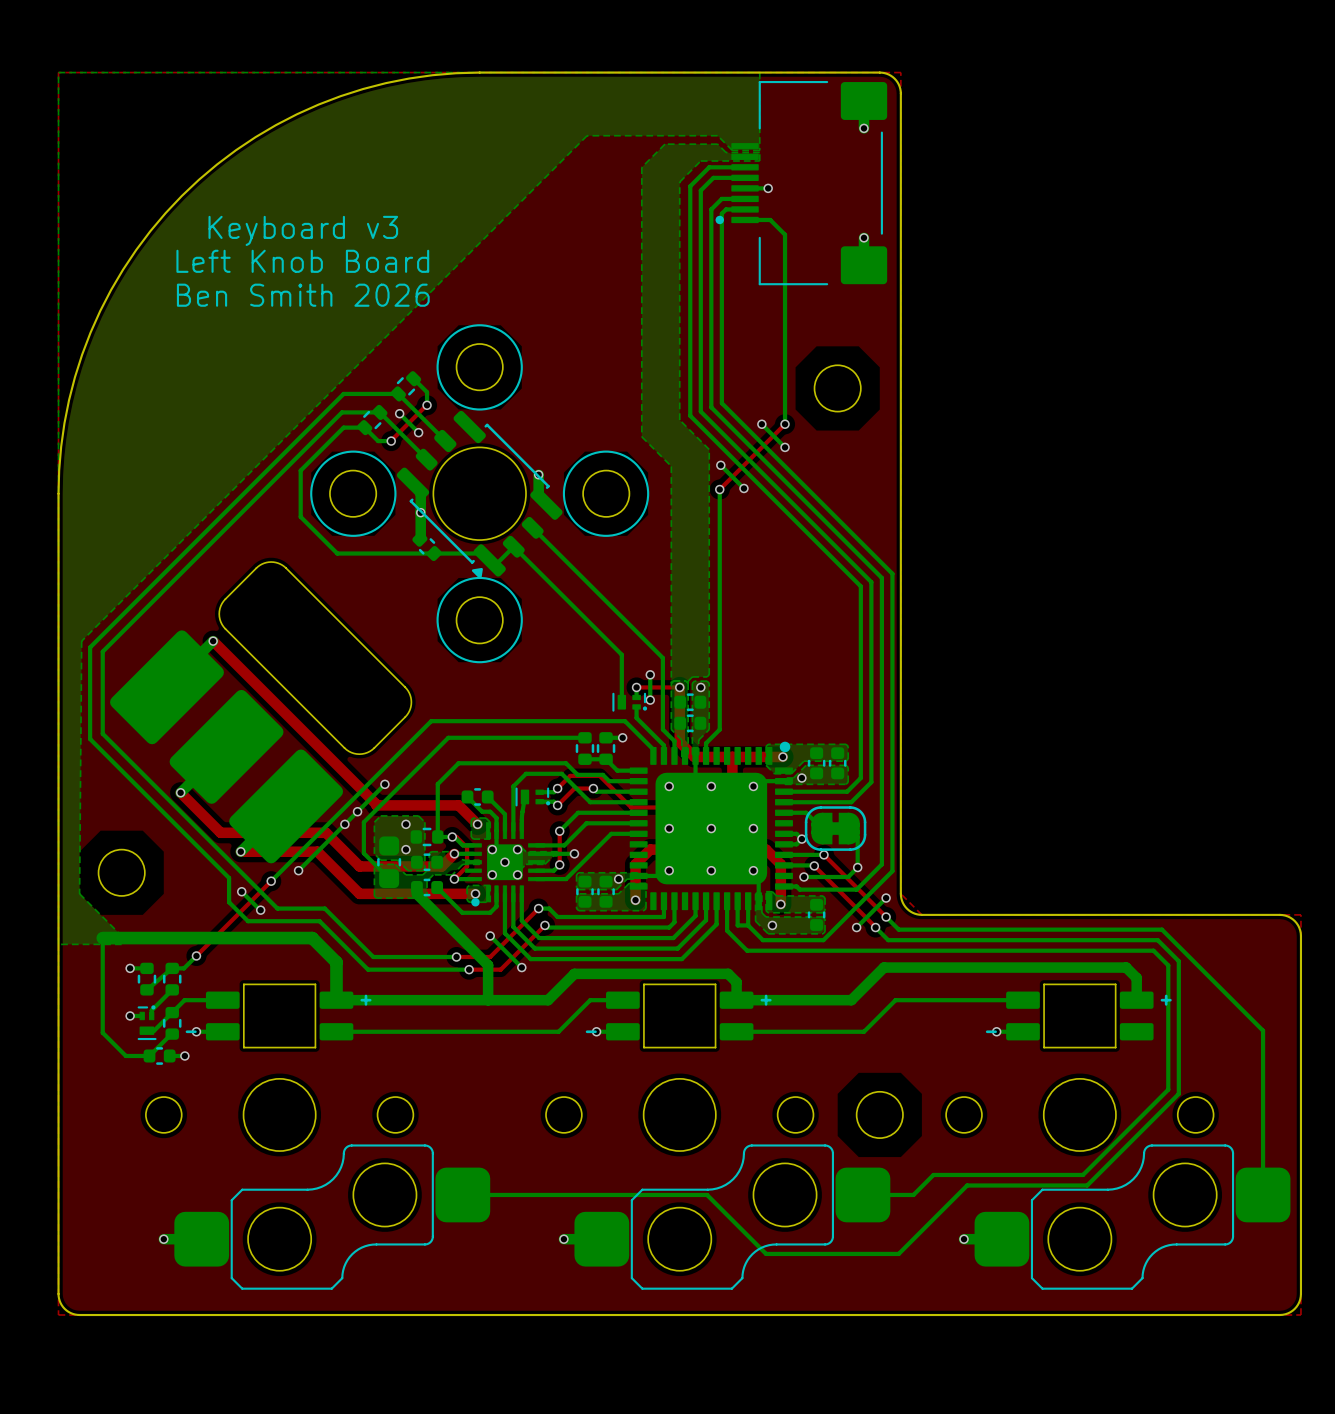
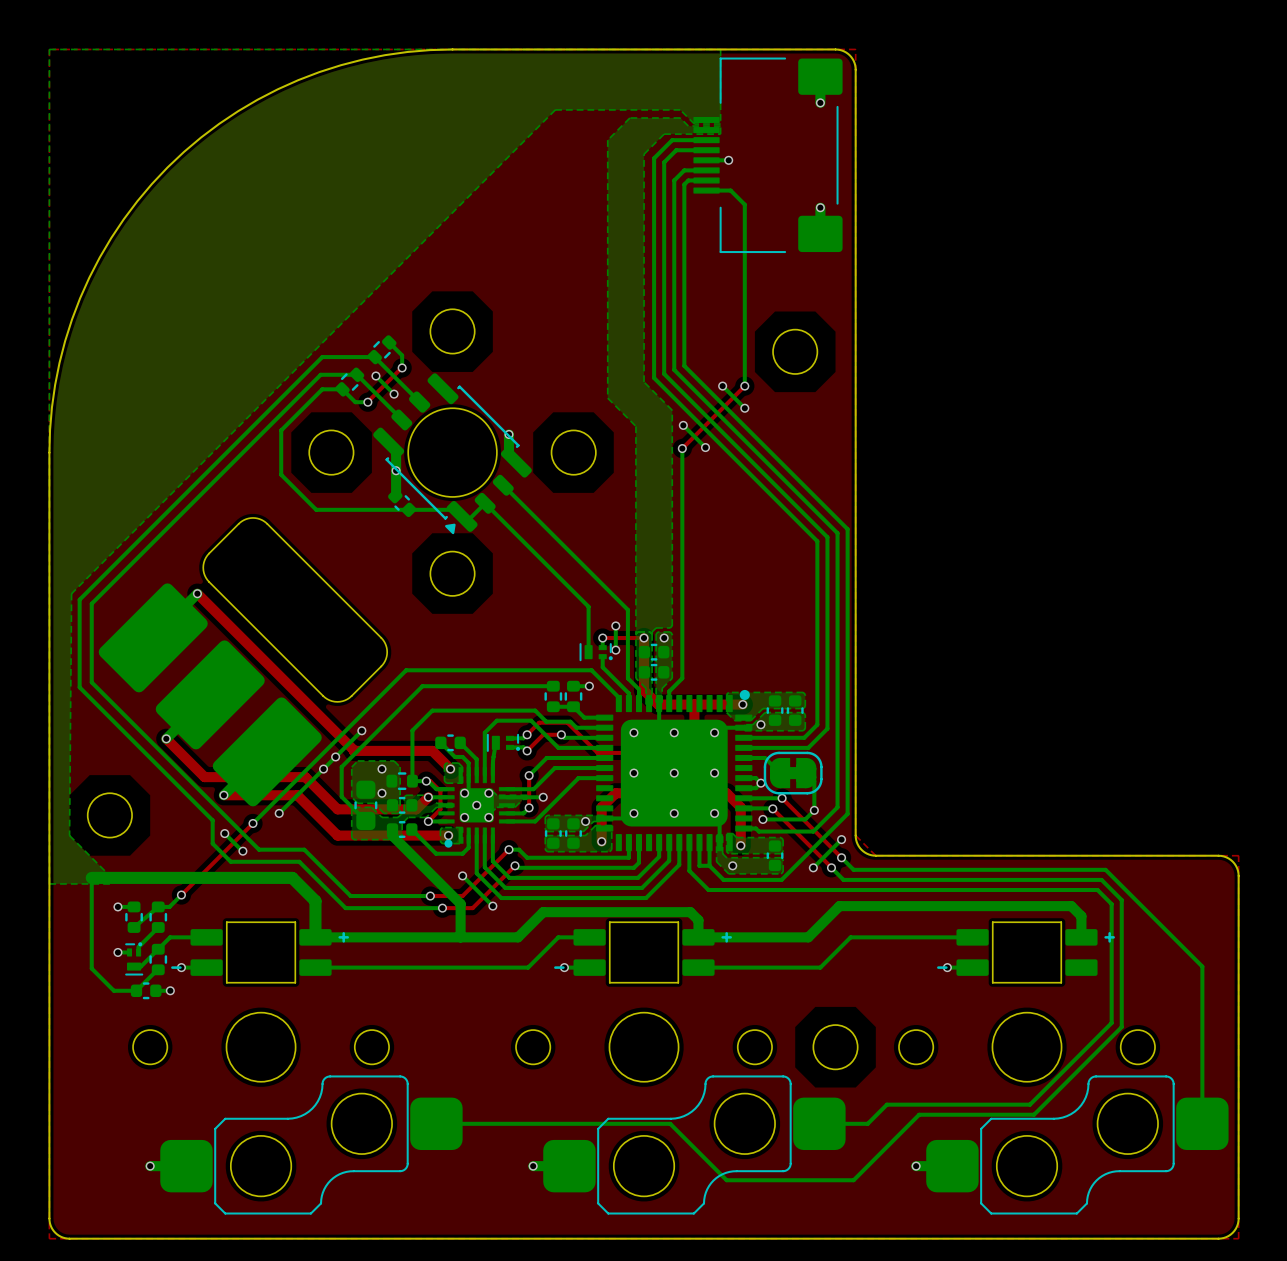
drawing: [715, 215, 724, 225] -> none
text: Keyboard v3 (303, 230) -> none
text: Left Knob Board (302, 261) -> none
text: Ben Smith 2026 (303, 295) -> none
drawing: [436, 324, 523, 411] -> none
drawing: [310, 450, 397, 537] -> none
drawing: [562, 450, 650, 537] -> none
drawing: [436, 576, 523, 664] -> none

